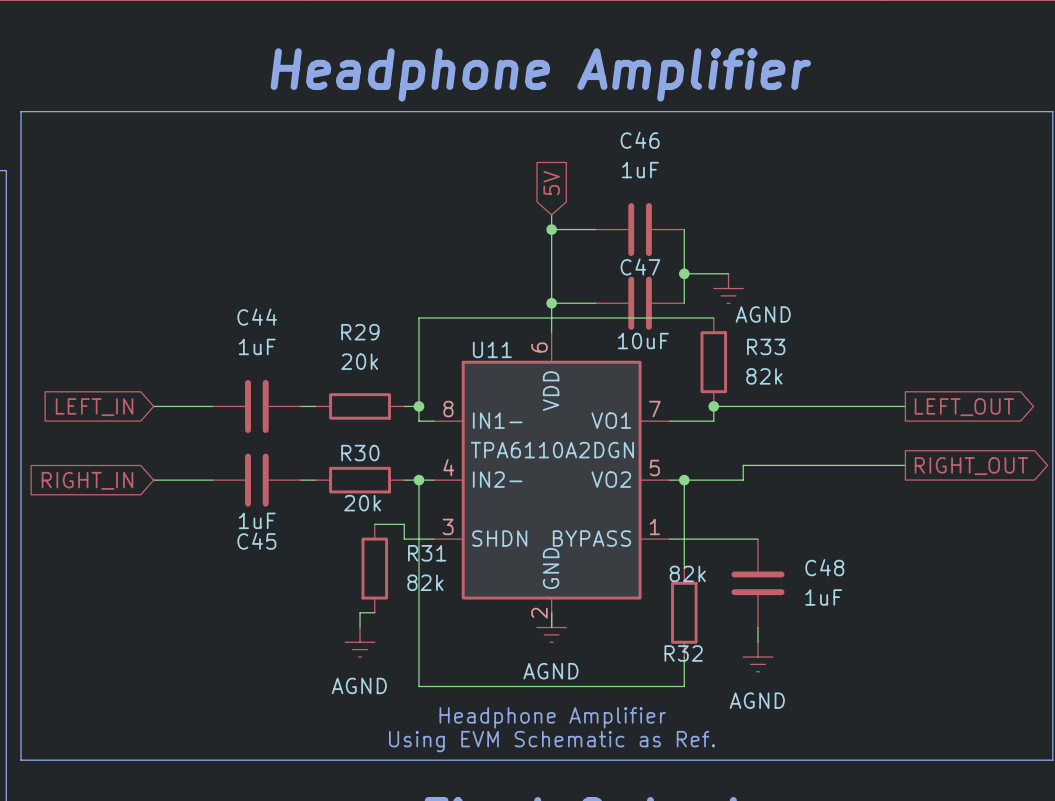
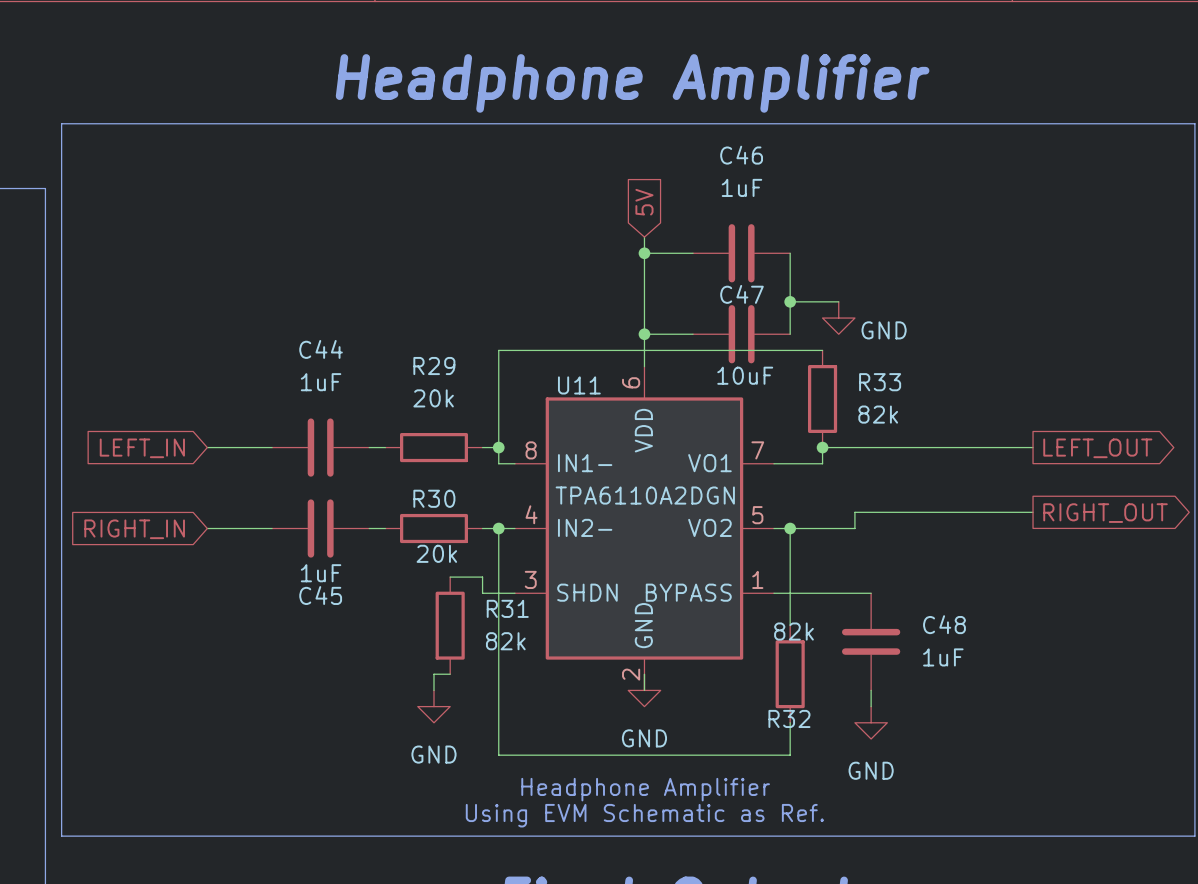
power symbol: AGND (728, 288) -> GND (838, 318)
power symbol: AGND (551, 627) -> GND (644, 690)
power symbol: AGND (360, 642) -> GND (433, 706)
power symbol: AGND (757, 657) -> GND (871, 722)

